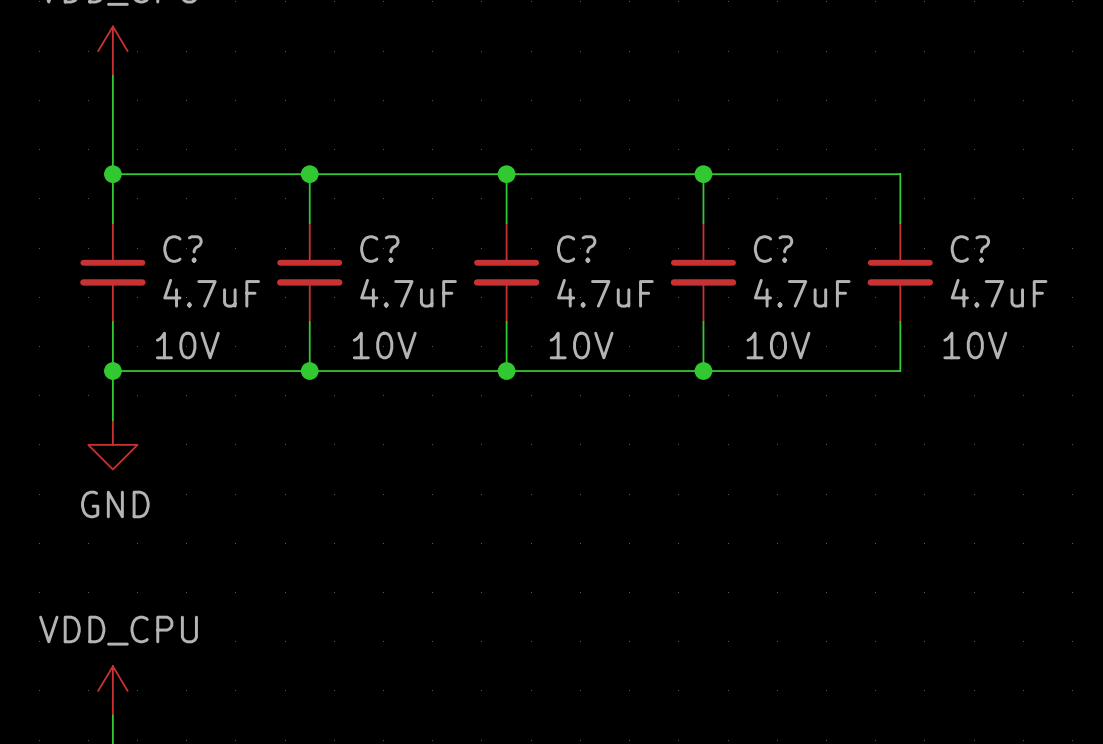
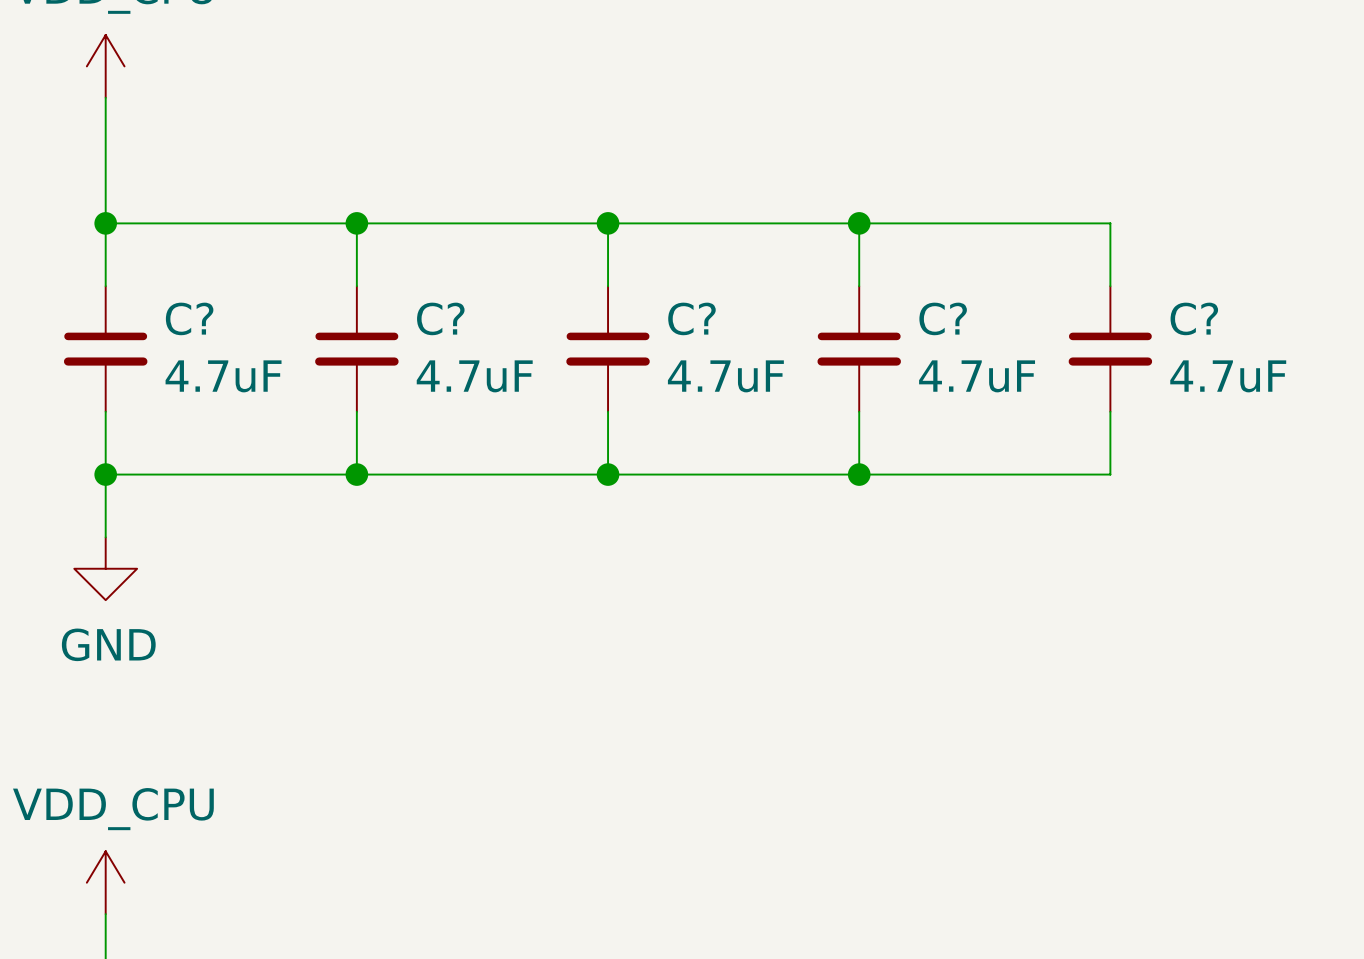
C? text: 10V (187, 345) -> none
C? text: 10V (384, 345) -> none
C? text: 10V (581, 345) -> none
C? text: 10V (778, 345) -> none
C? text: 10V (975, 345) -> none

